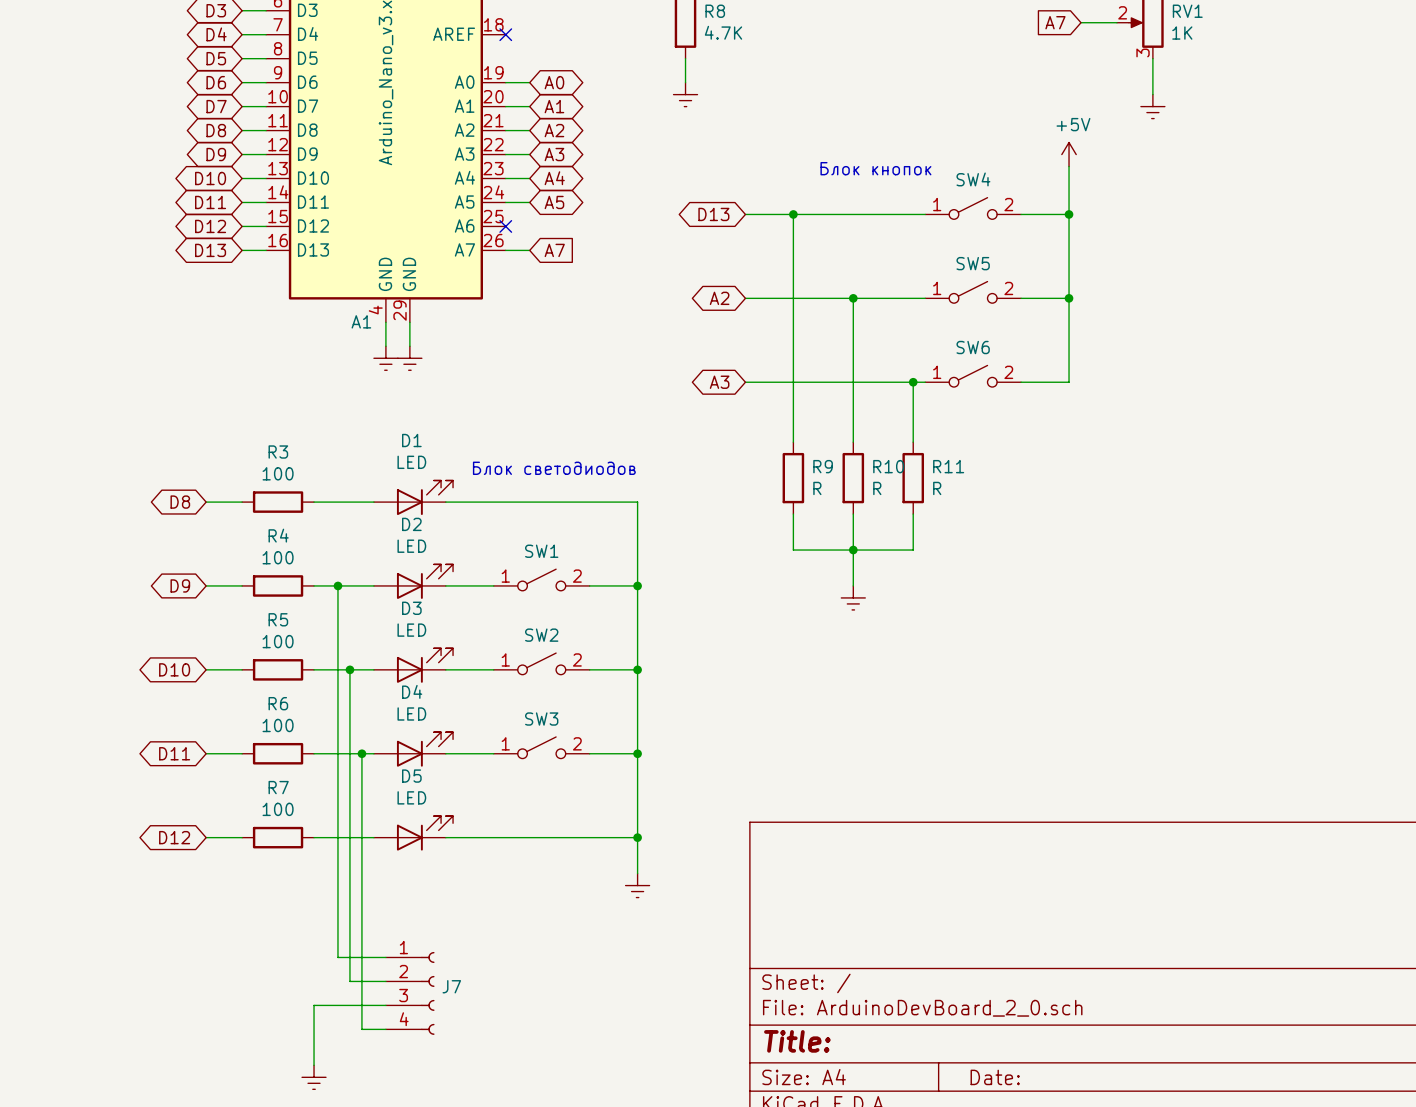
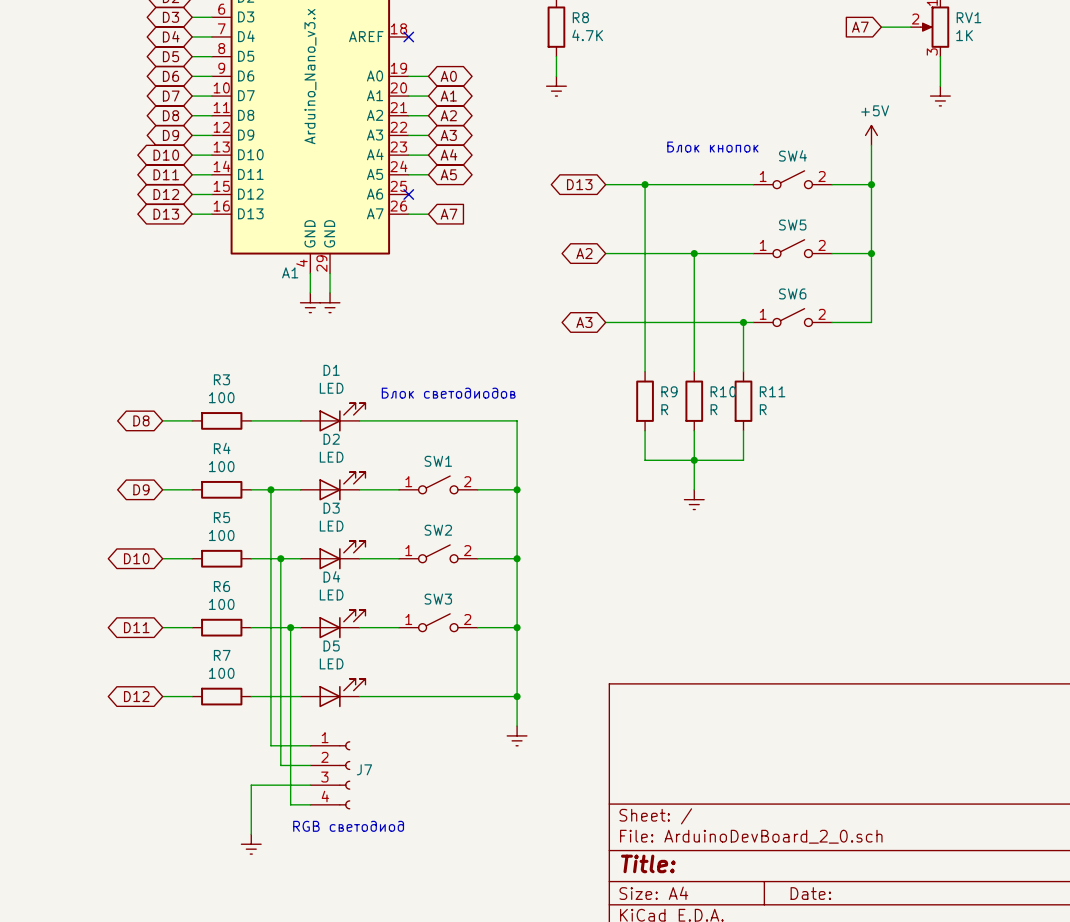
wire: (337, 897) (337, 957) (385, 957) -> (270, 745) (310, 745)
wire: (349, 921) (349, 981) (385, 981) -> (280, 765) (310, 765)
wire: (361, 969) (361, 1029) (385, 1029) -> (290, 804) (310, 804)
J7 position: (410, 993) -> (330, 775)
text: none -> RGB светодиод (348, 826)
wire: (385, 1005) (314, 1005) (314, 1065) -> (310, 785) (251, 785) (251, 834)
power symbol position: (314, 1077) -> (251, 844)

